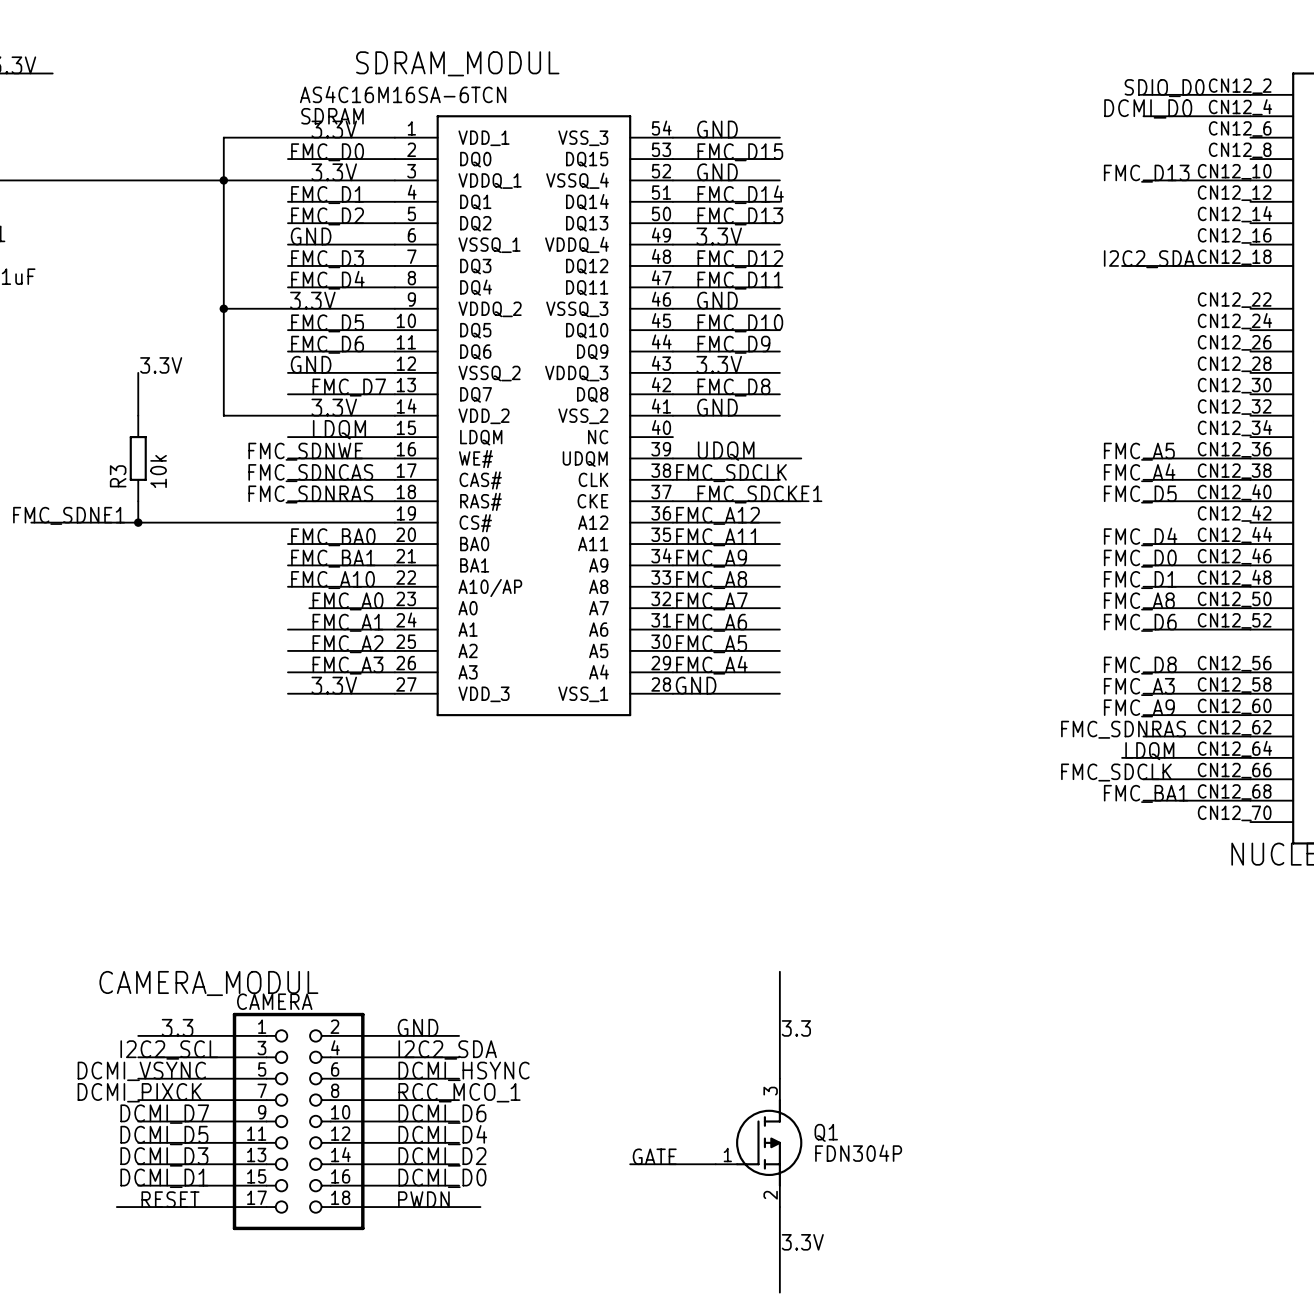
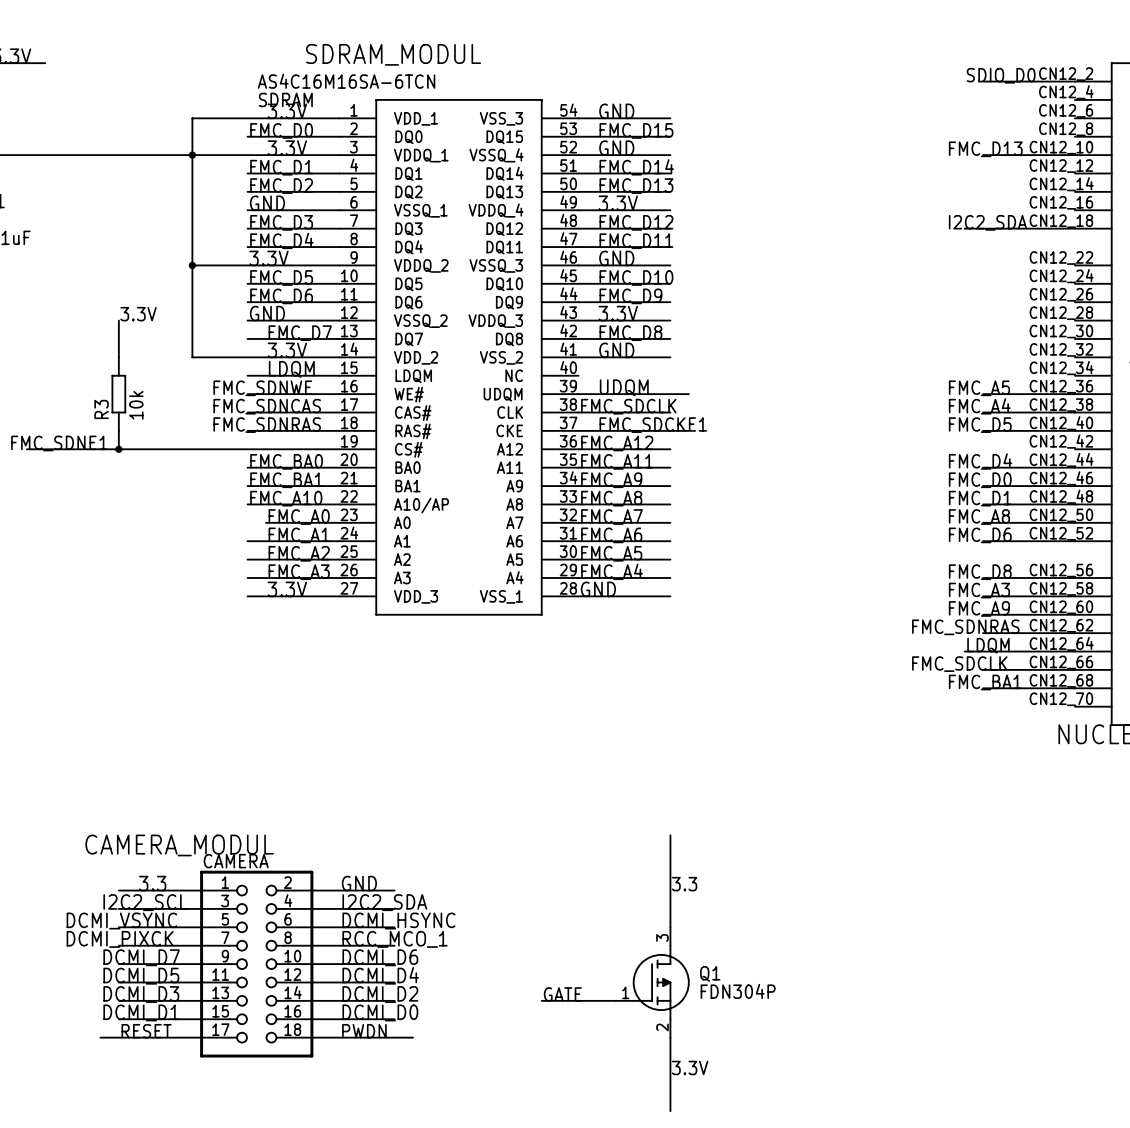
label: DCMI_D0 (1148, 108) -> none
wire: (1143, 116) (1250, 116) -> none

